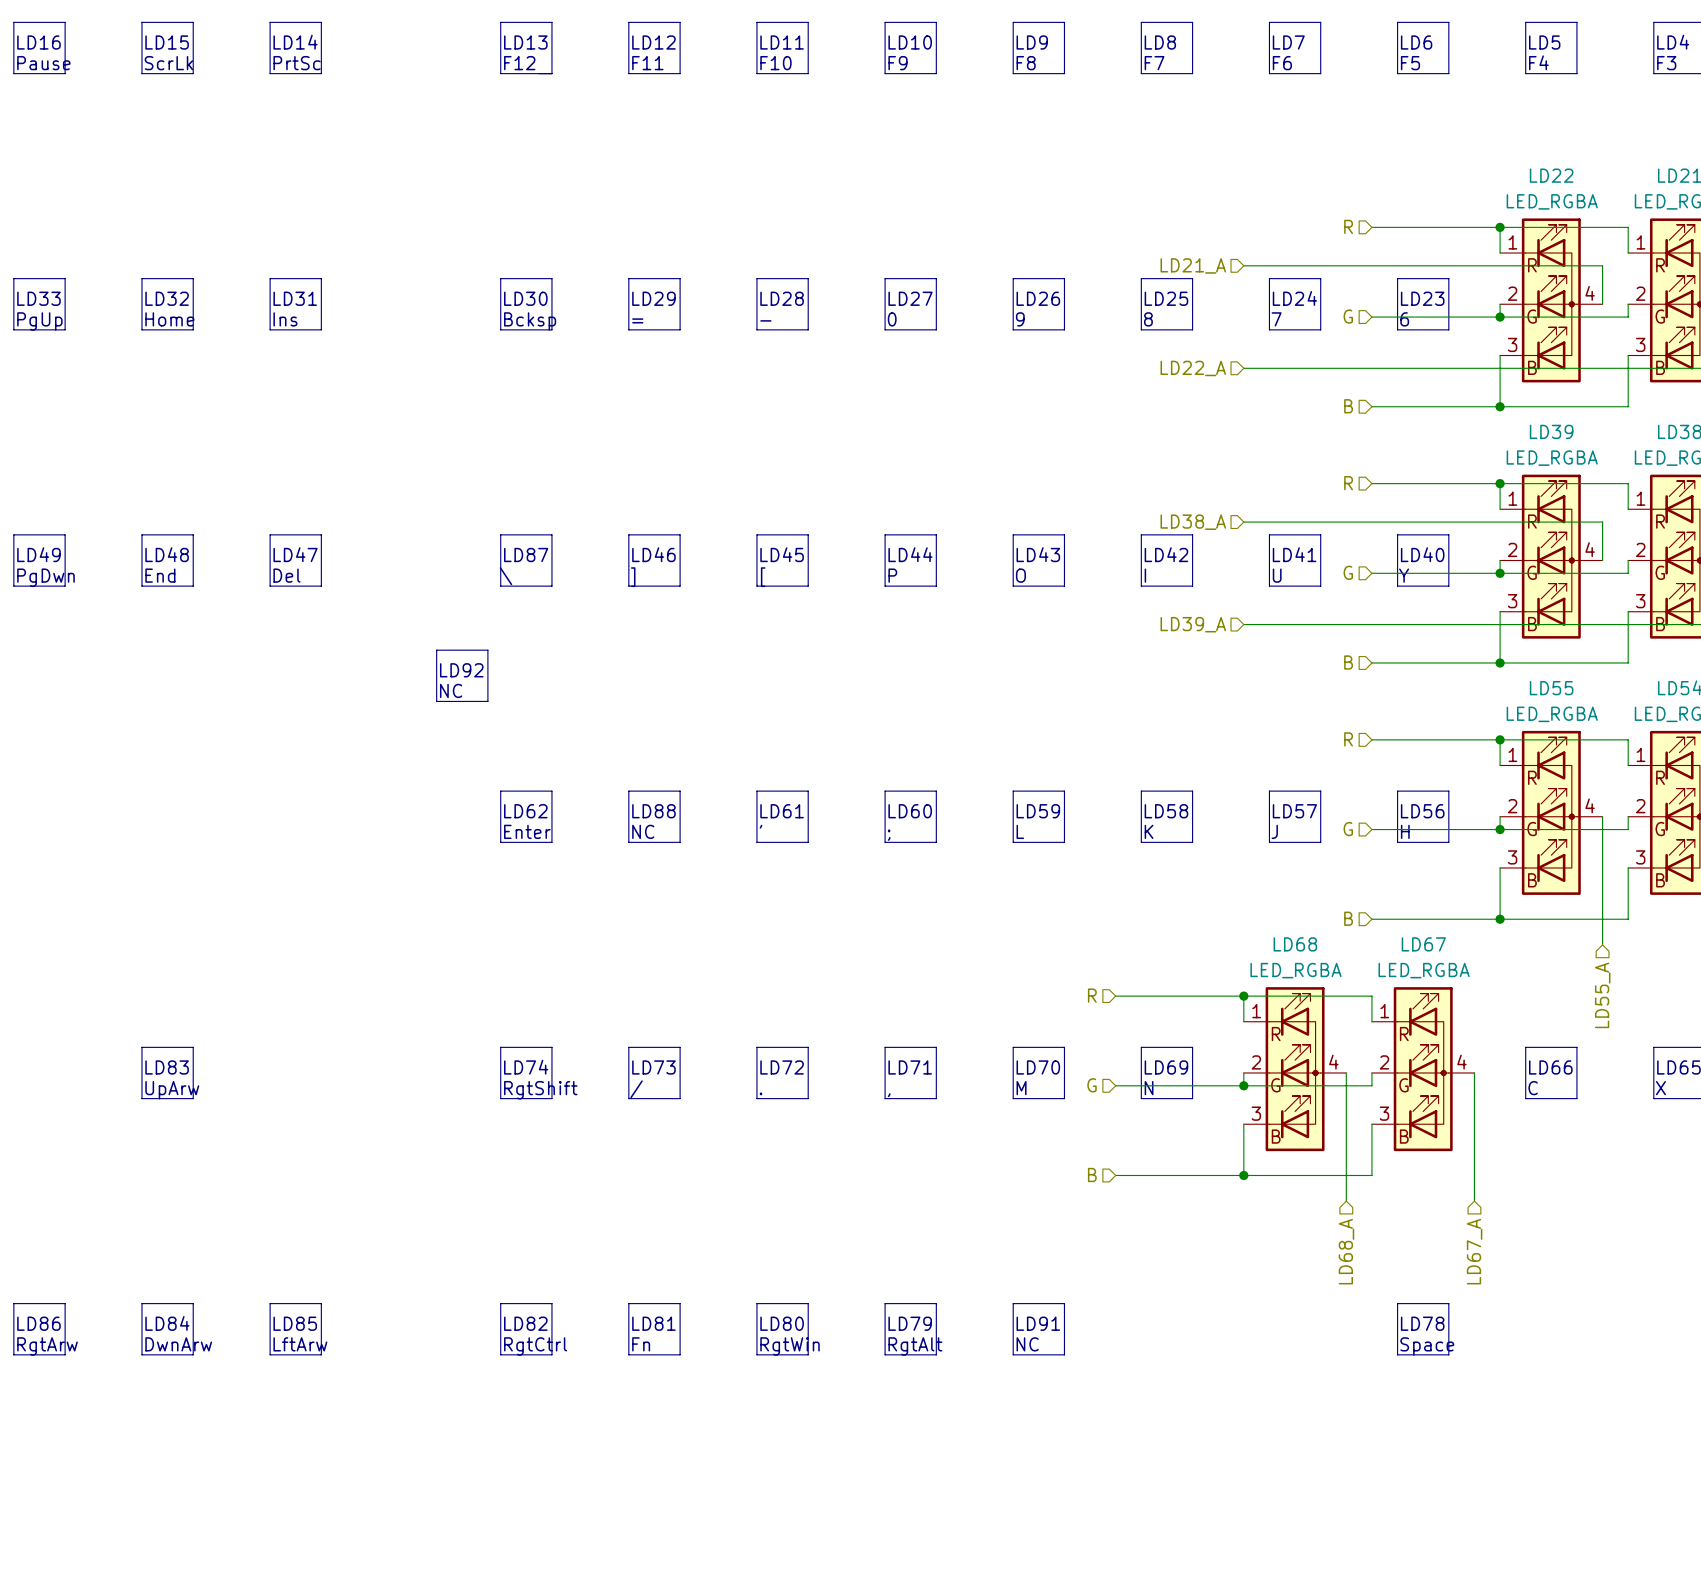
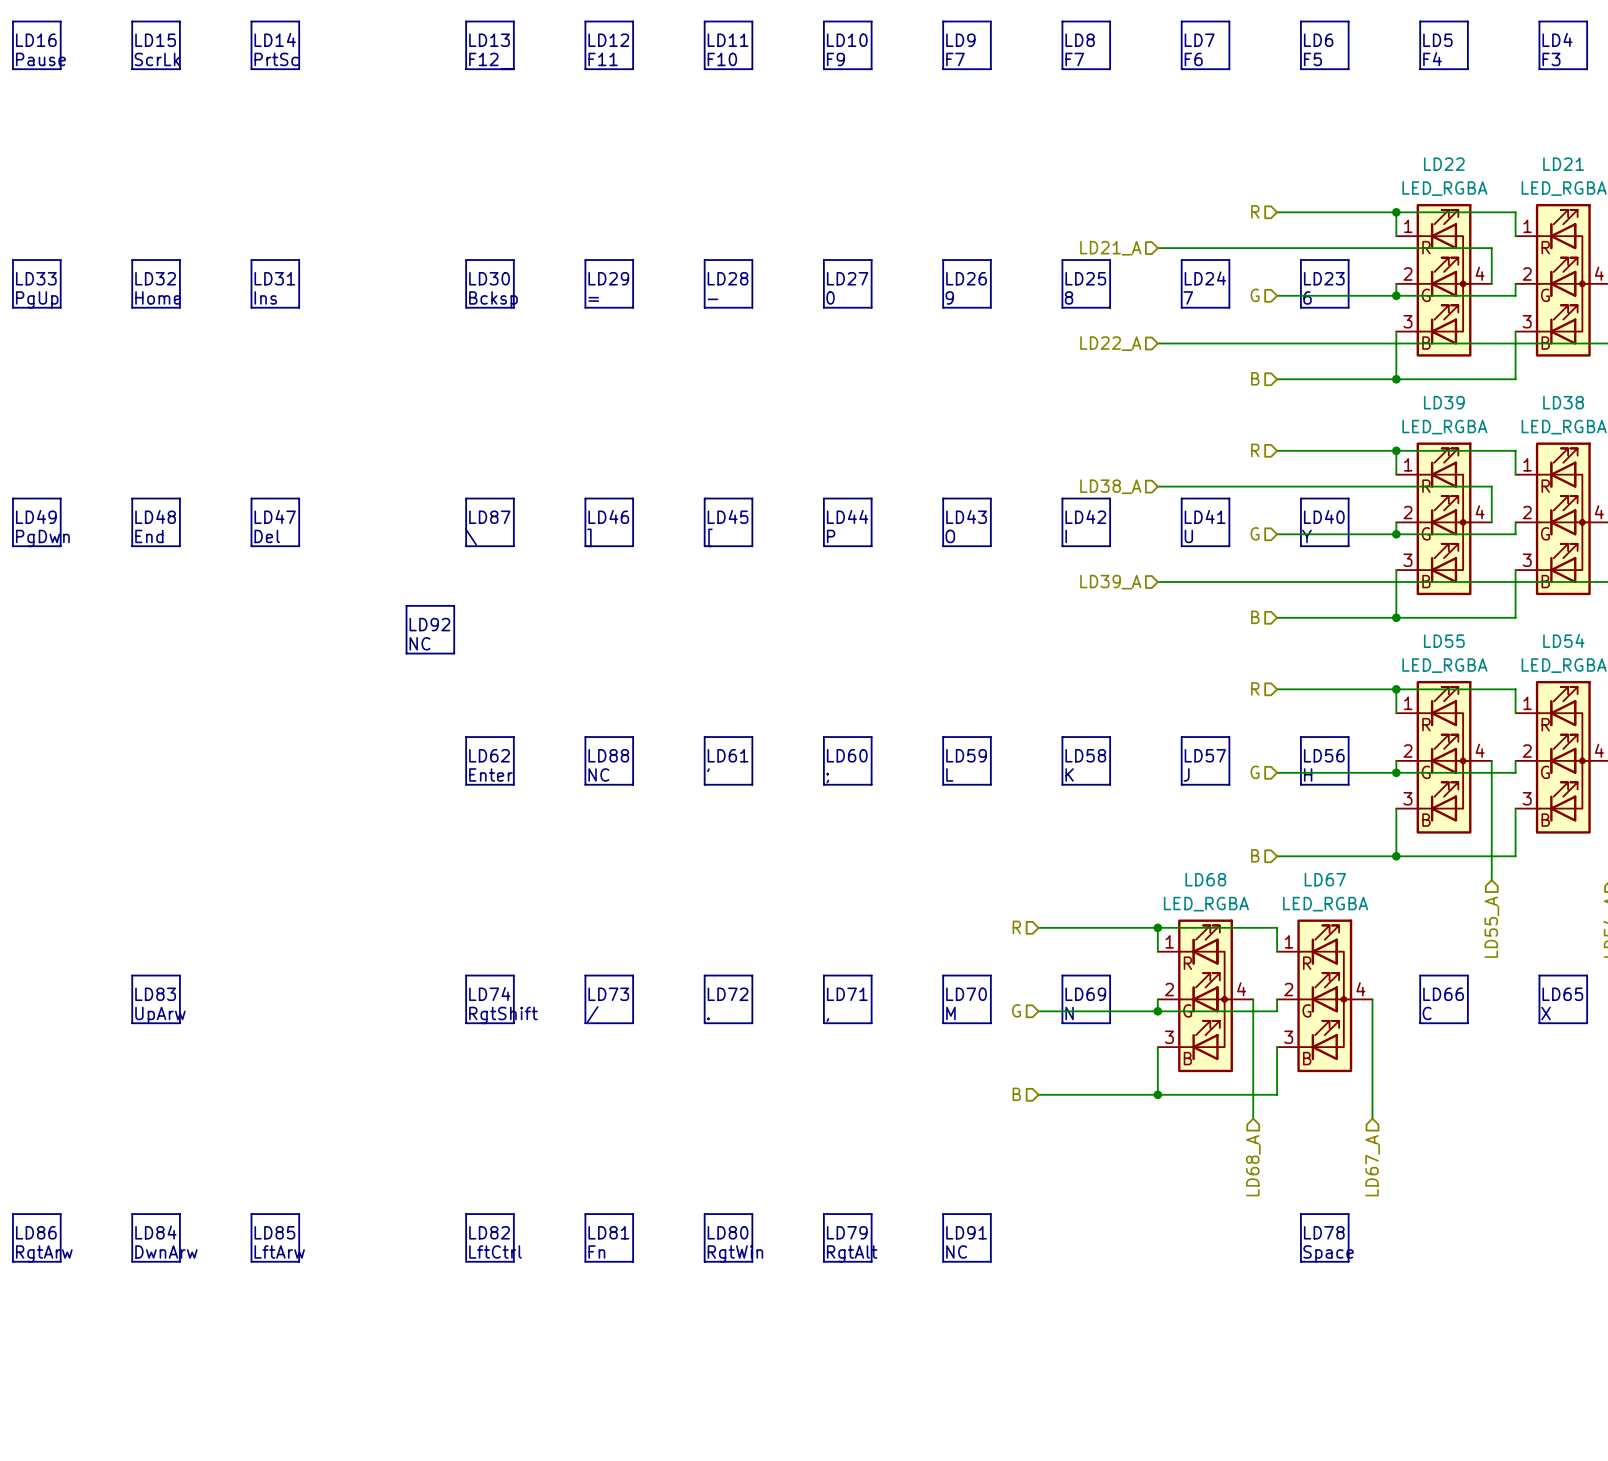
text: F8 (1026, 63) -> F7 (955, 59)
text: RgtCtrl (535, 1346) -> LftCtrl (495, 1251)

